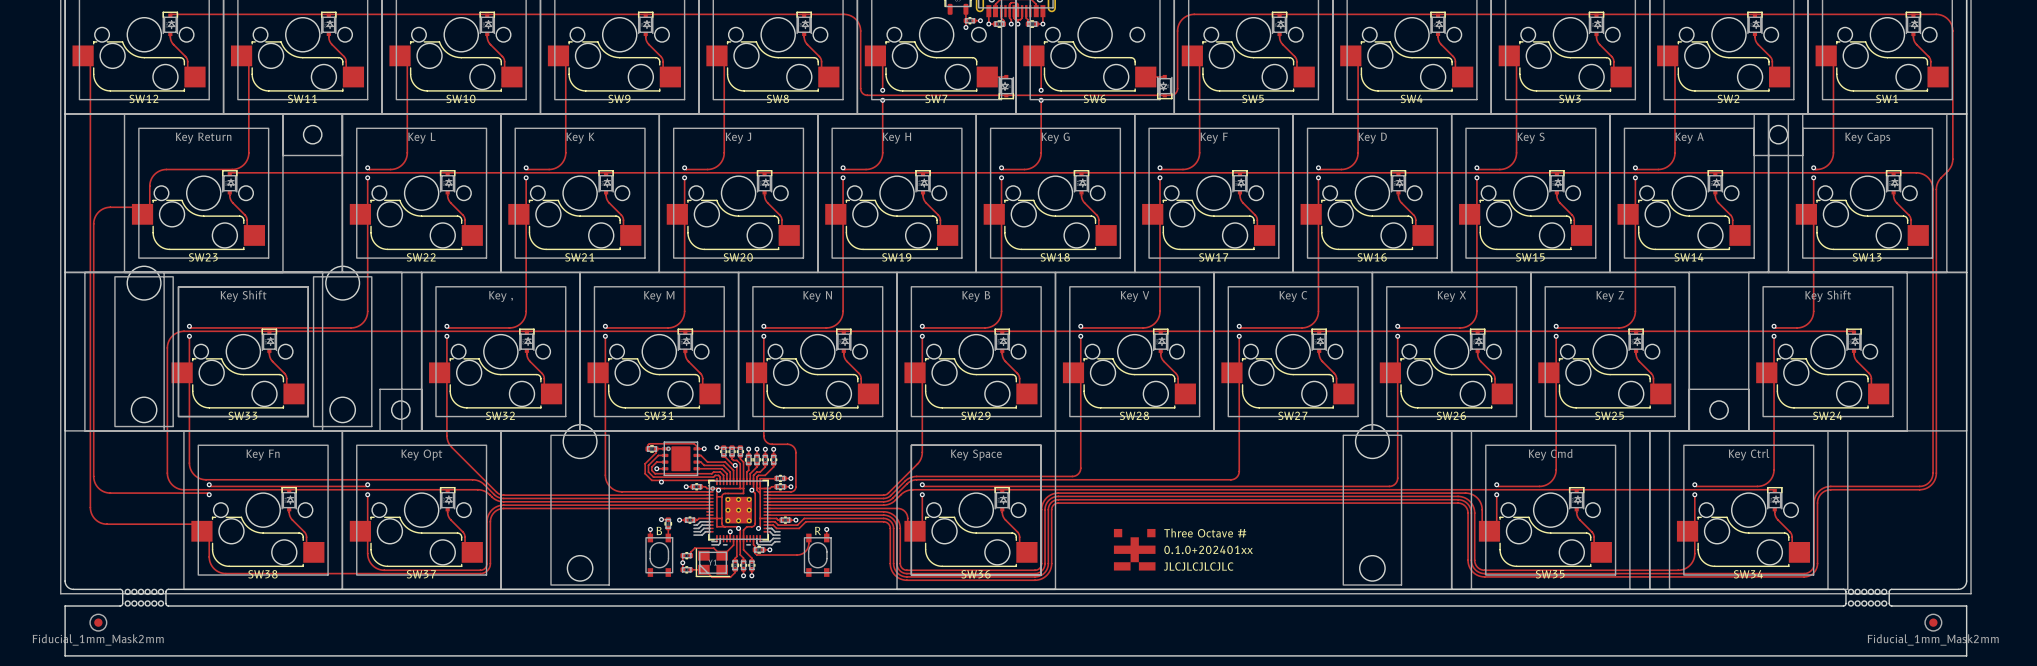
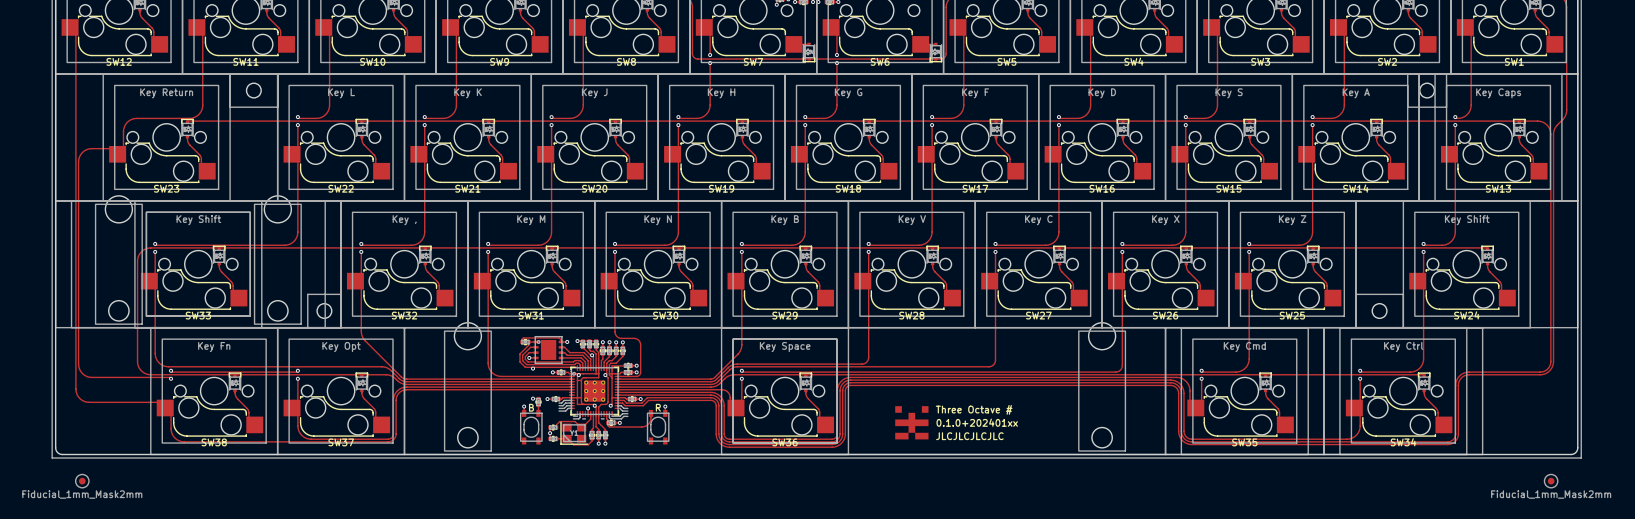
round board edge: [124, 588, 131, 595] -> none
round board edge: [131, 588, 138, 595] -> none
round board edge: [138, 588, 144, 595] -> none
round board edge: [144, 588, 151, 595] -> none
round board edge: [151, 588, 158, 595] -> none
round board edge: [158, 588, 164, 595] -> none
round board edge: [1848, 588, 1854, 595] -> none
round board edge: [1854, 588, 1861, 595] -> none
round board edge: [1861, 588, 1868, 595] -> none
round board edge: [1868, 588, 1874, 595] -> none
round board edge: [1874, 588, 1881, 595] -> none
round board edge: [1881, 588, 1888, 595] -> none
board edge: (120, 589) (122, 591) (122, 603) (120, 605) (65, 606) (65, 655) (1966, 655) (1966, 606) (1891, 605) (1889, 603) (1889, 591) (1891, 589) -> (99, 454) (138, 454)
board edge: (168, 589) (165, 591) (165, 603) (168, 606) (1843, 606) (1845, 603) (1845, 591) (1843, 589) -> (1517, 454) (1479, 454)
round board edge: [124, 600, 131, 607] -> none
round board edge: [131, 600, 138, 607] -> none
round board edge: [138, 600, 144, 607] -> none
round board edge: [144, 600, 151, 607] -> none
round board edge: [151, 600, 158, 607] -> none
round board edge: [158, 600, 164, 607] -> none
round board edge: [1848, 600, 1854, 607] -> none
round board edge: [1854, 600, 1861, 607] -> none
round board edge: [1861, 600, 1868, 607] -> none
round board edge: [1868, 600, 1874, 607] -> none
round board edge: [1874, 600, 1881, 607] -> none
round board edge: [1881, 600, 1888, 607] -> none

